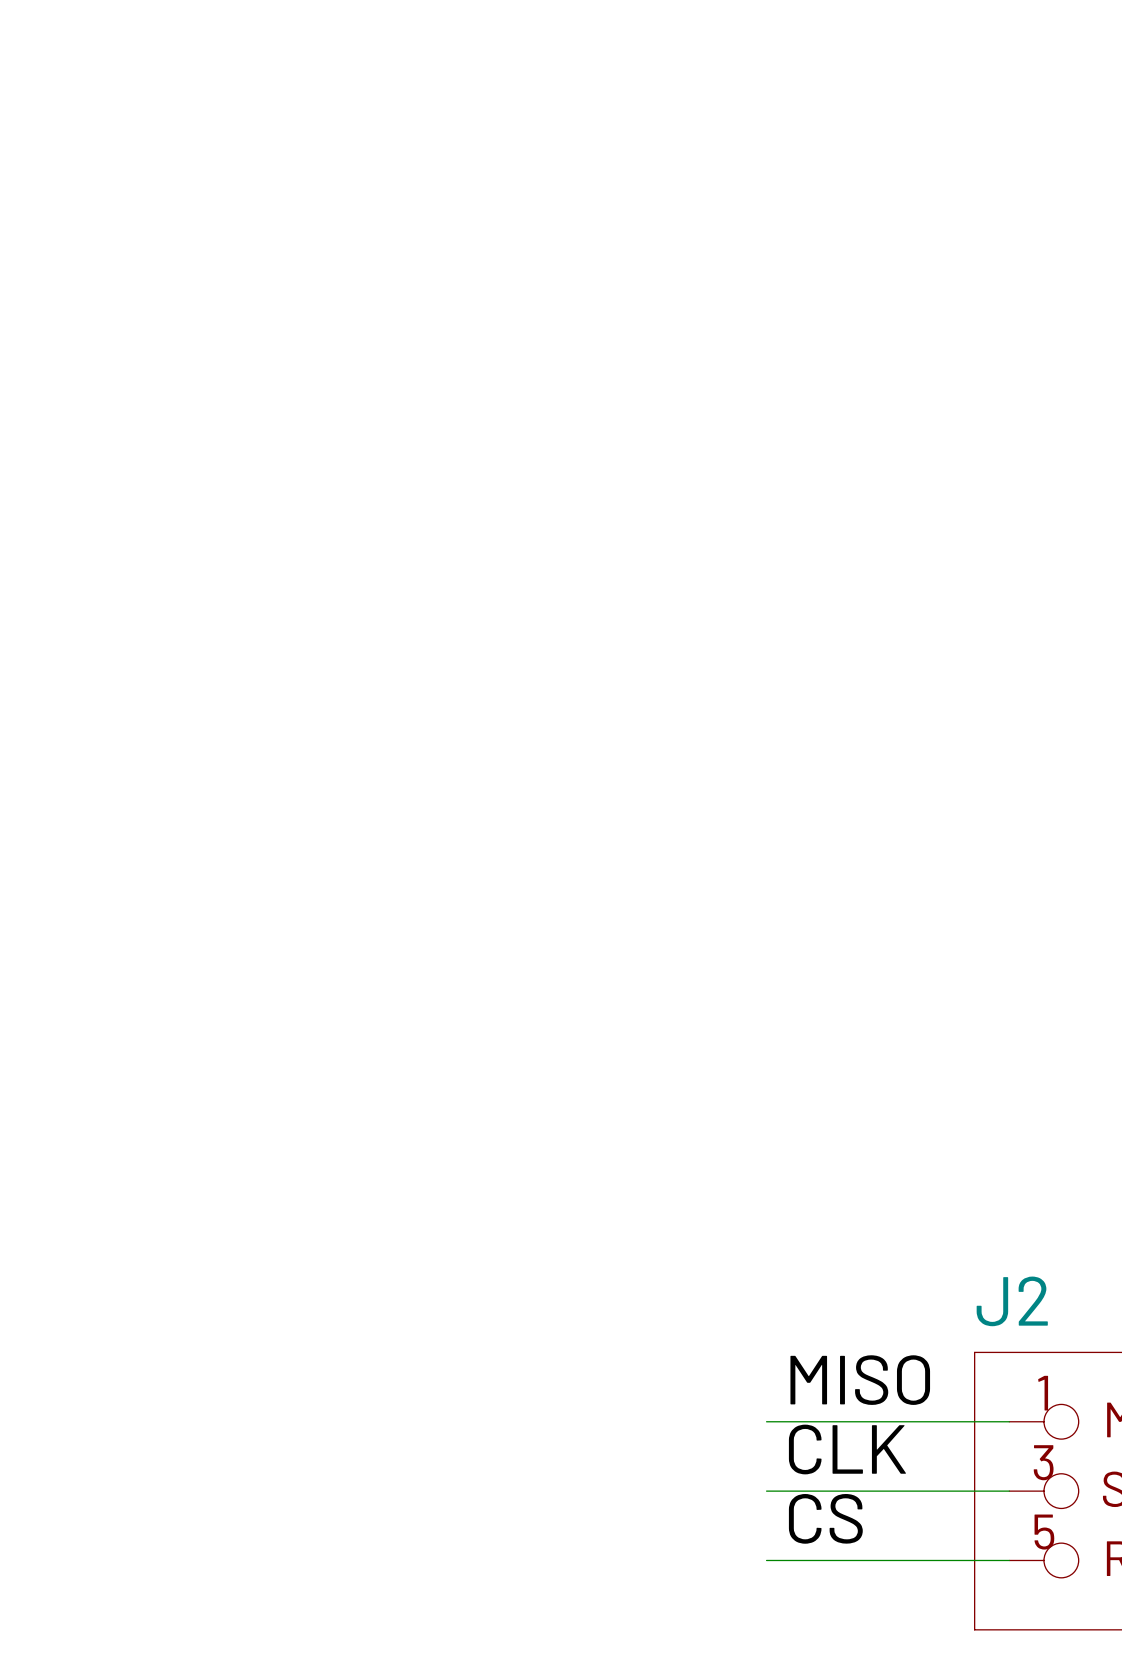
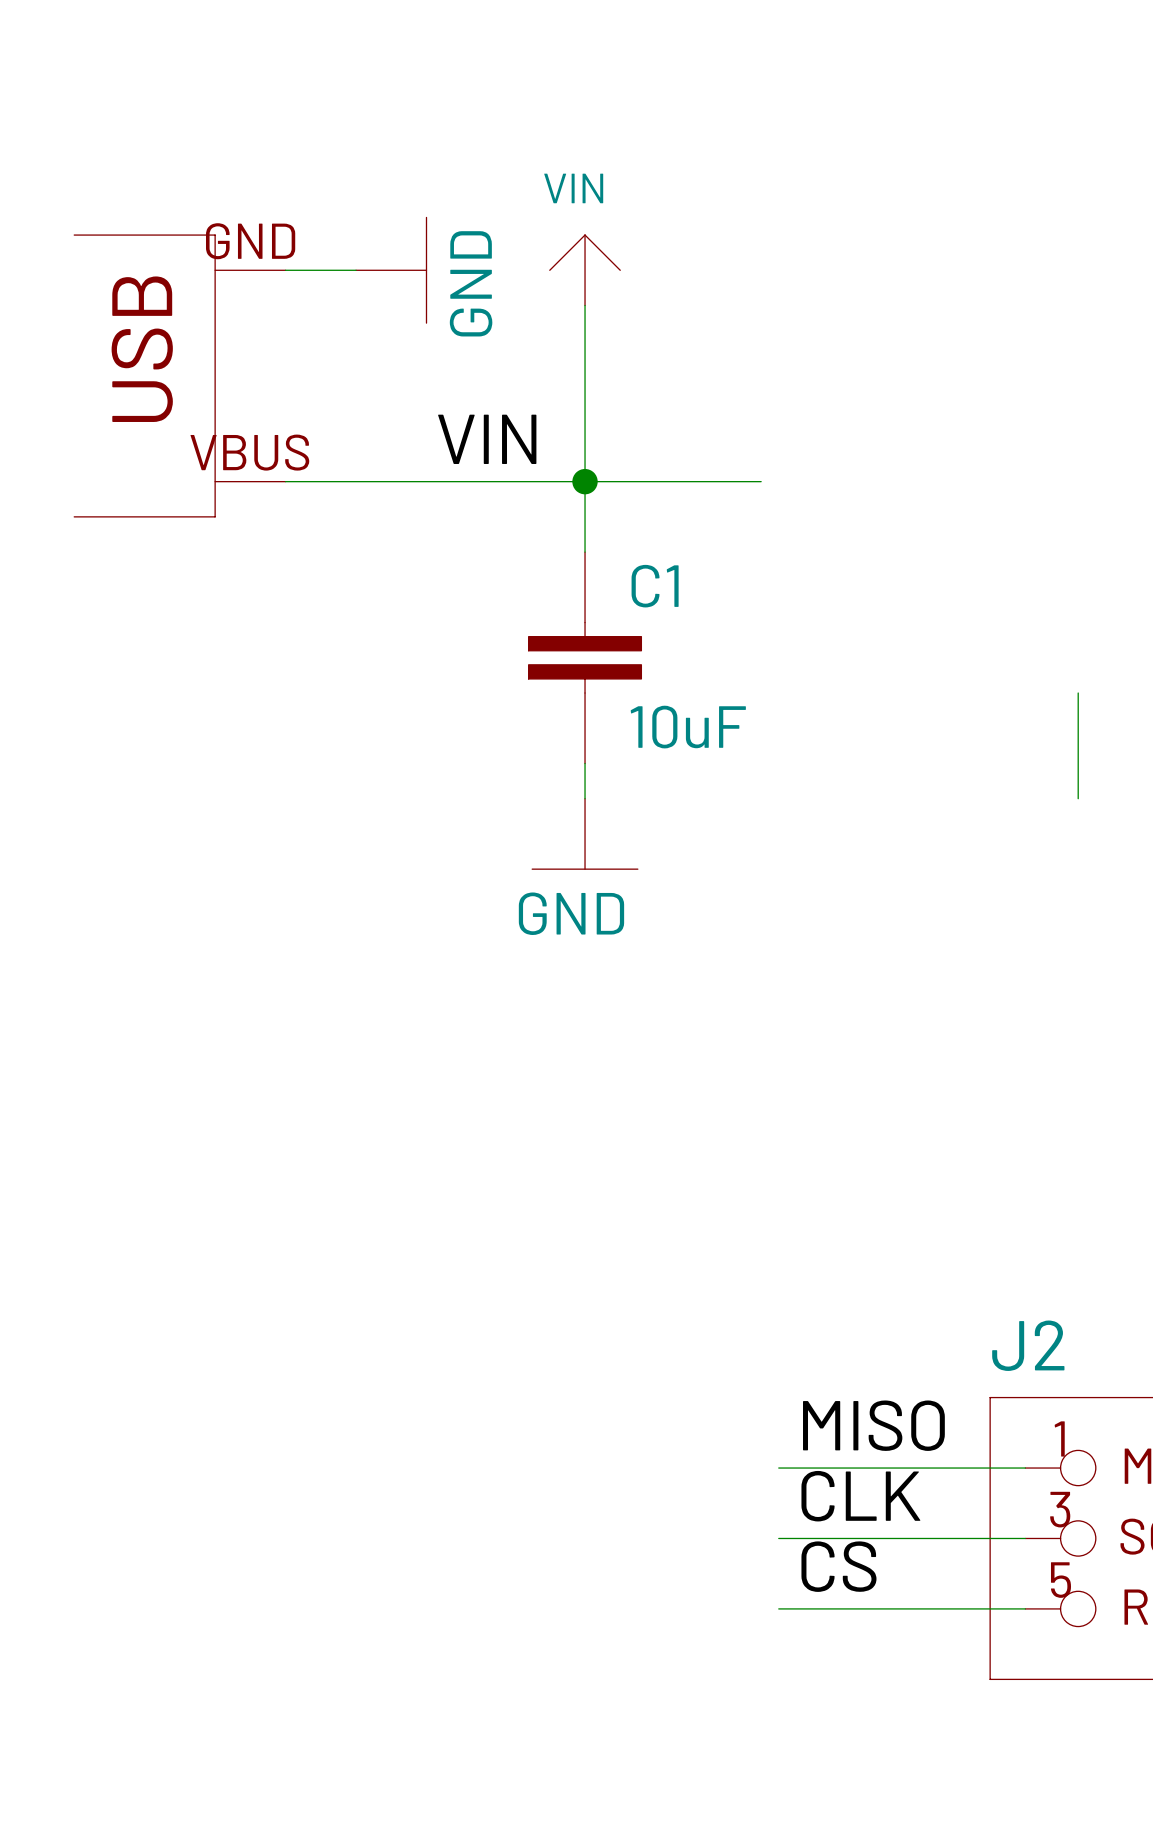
wire: none -> (285, 270) (356, 270)
power symbol: none -> GND (391, 270)
power symbol: none -> VIN (585, 270)
wire: none -> (585, 305) (585, 552)
part: none -> (179, 375)
label: none -> VIN (487, 439)
wire: none -> (285, 481) (761, 481)
junction: none -> (585, 481)
C1: none -> 10uF (585, 657)
wire: none -> (1078, 693) (1078, 798)
wire: none -> (585, 763) (585, 798)
power symbol: none -> GND (585, 833)

